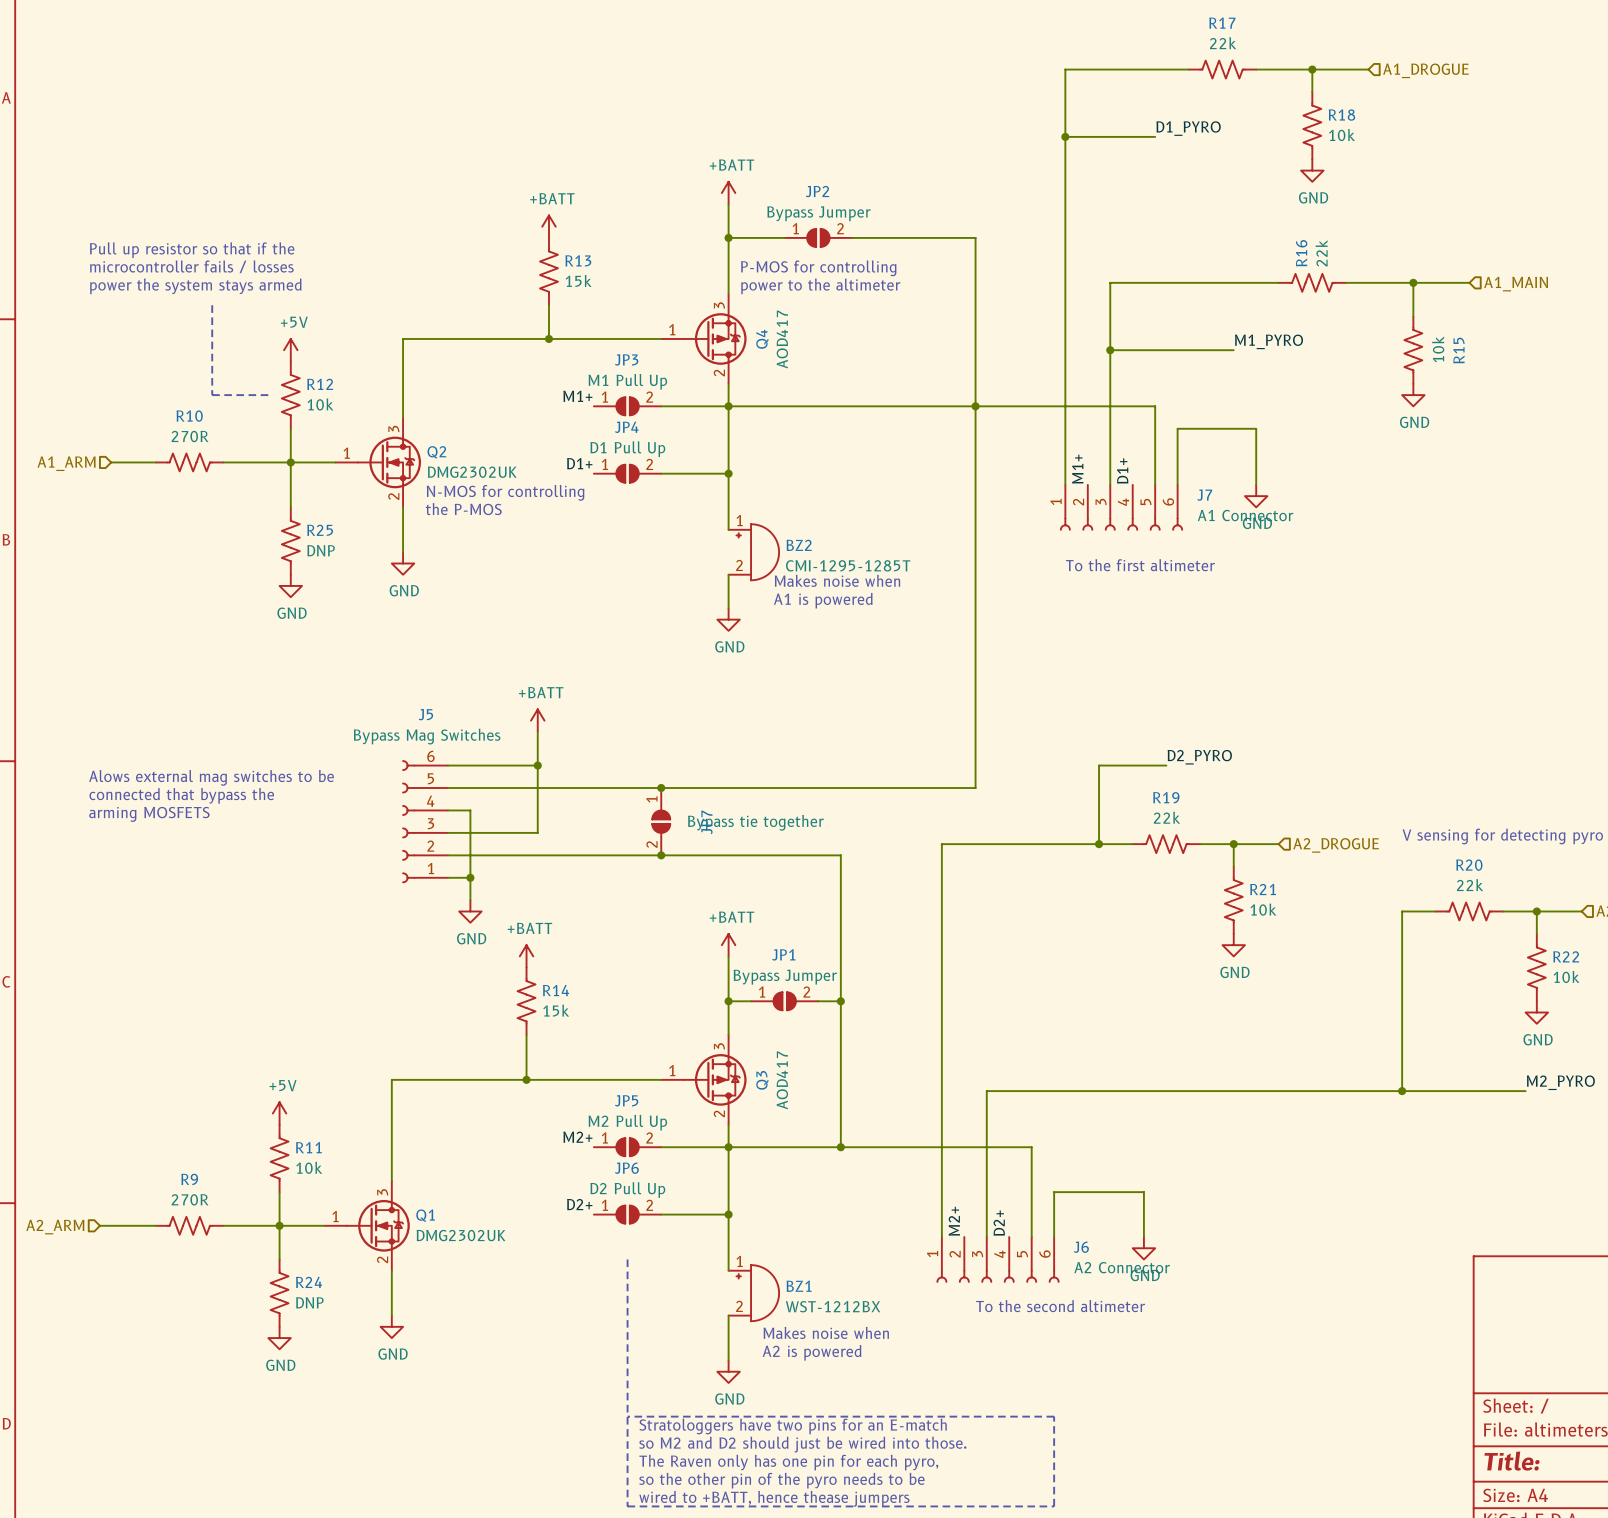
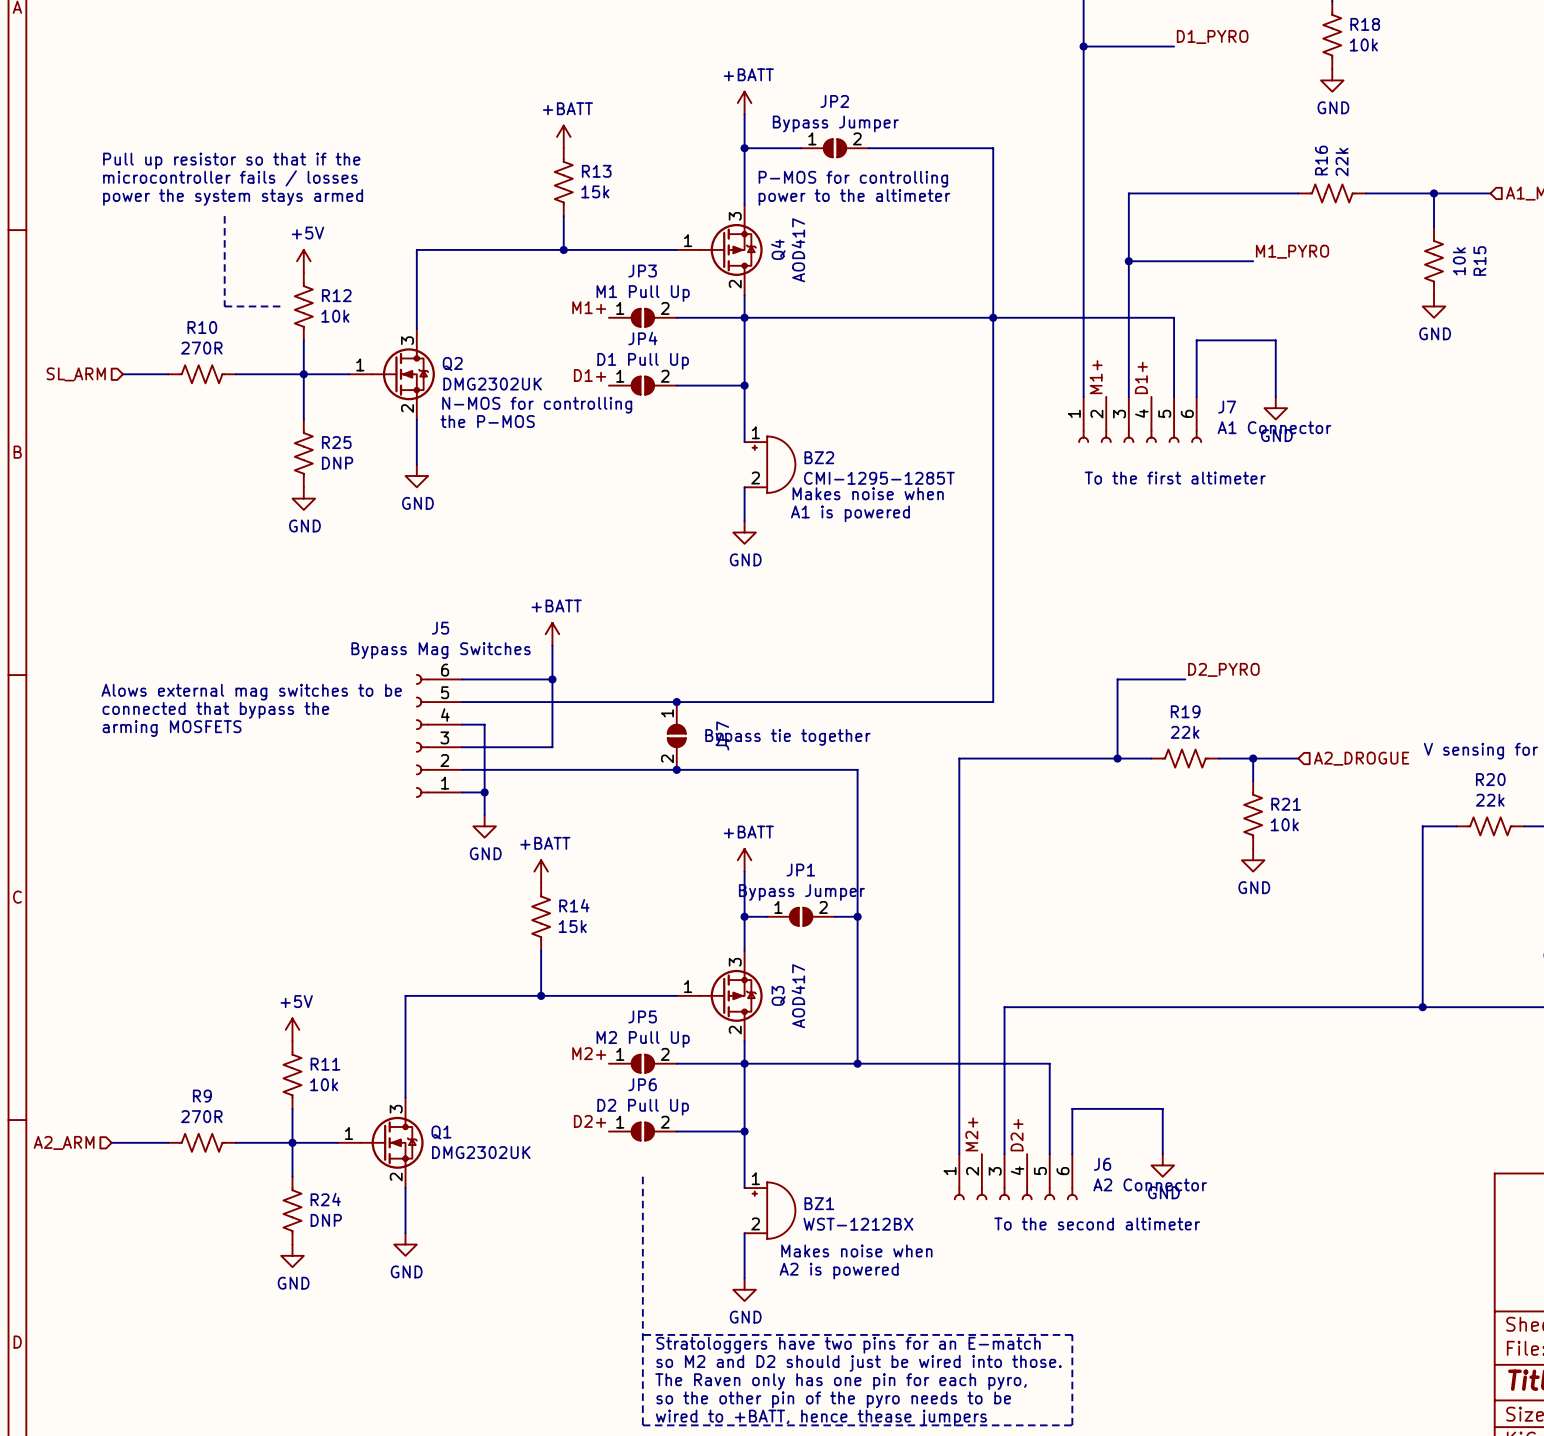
hierarchical label: A1_ARM (66, 463) -> SL_ARM (76, 374)

